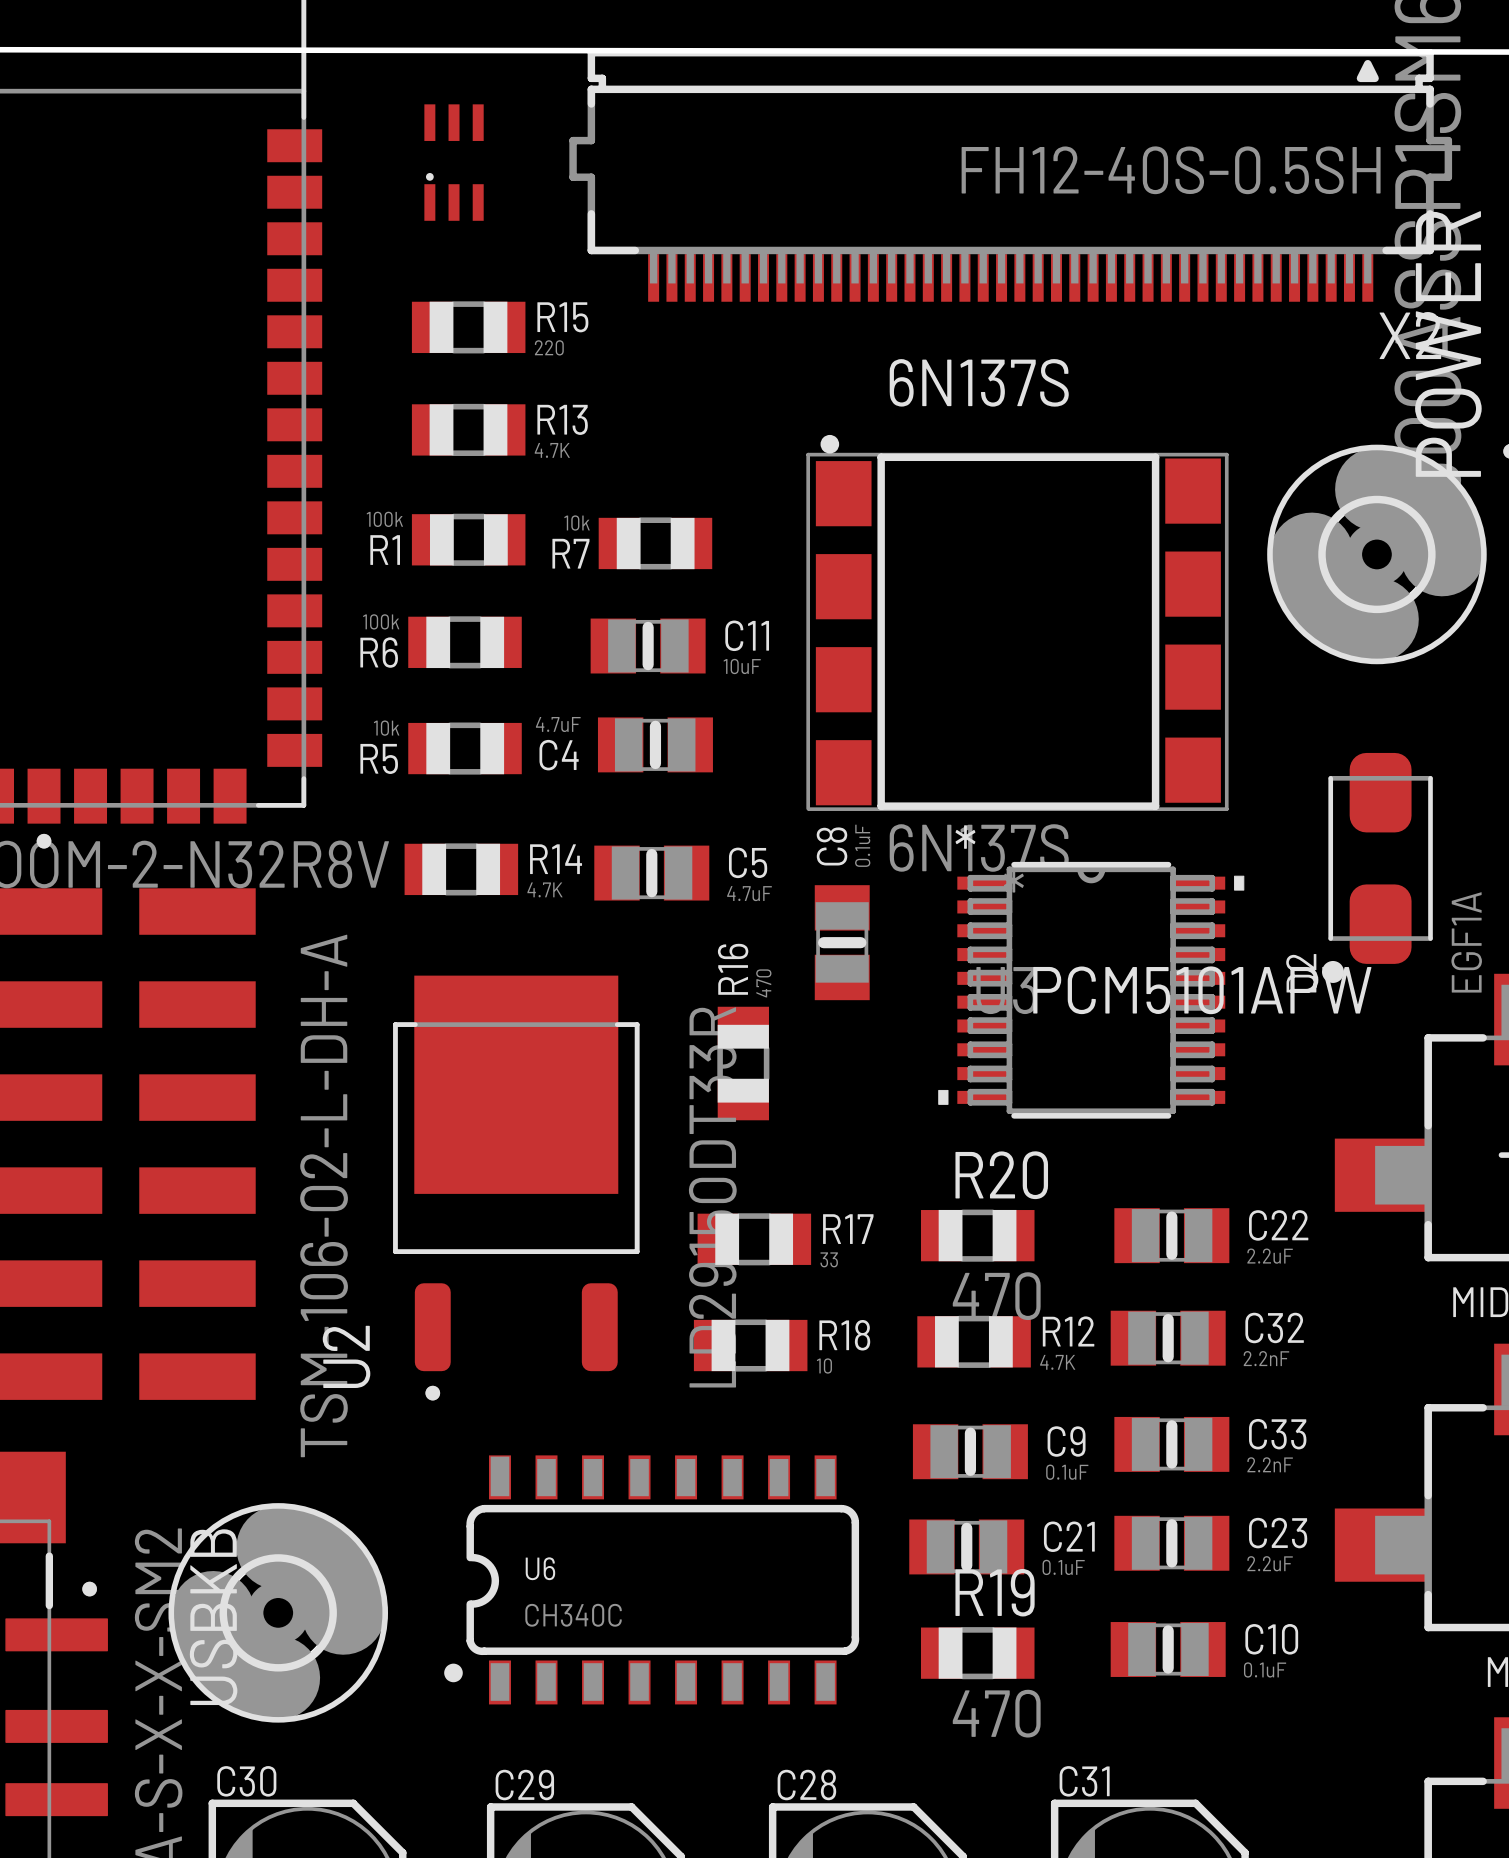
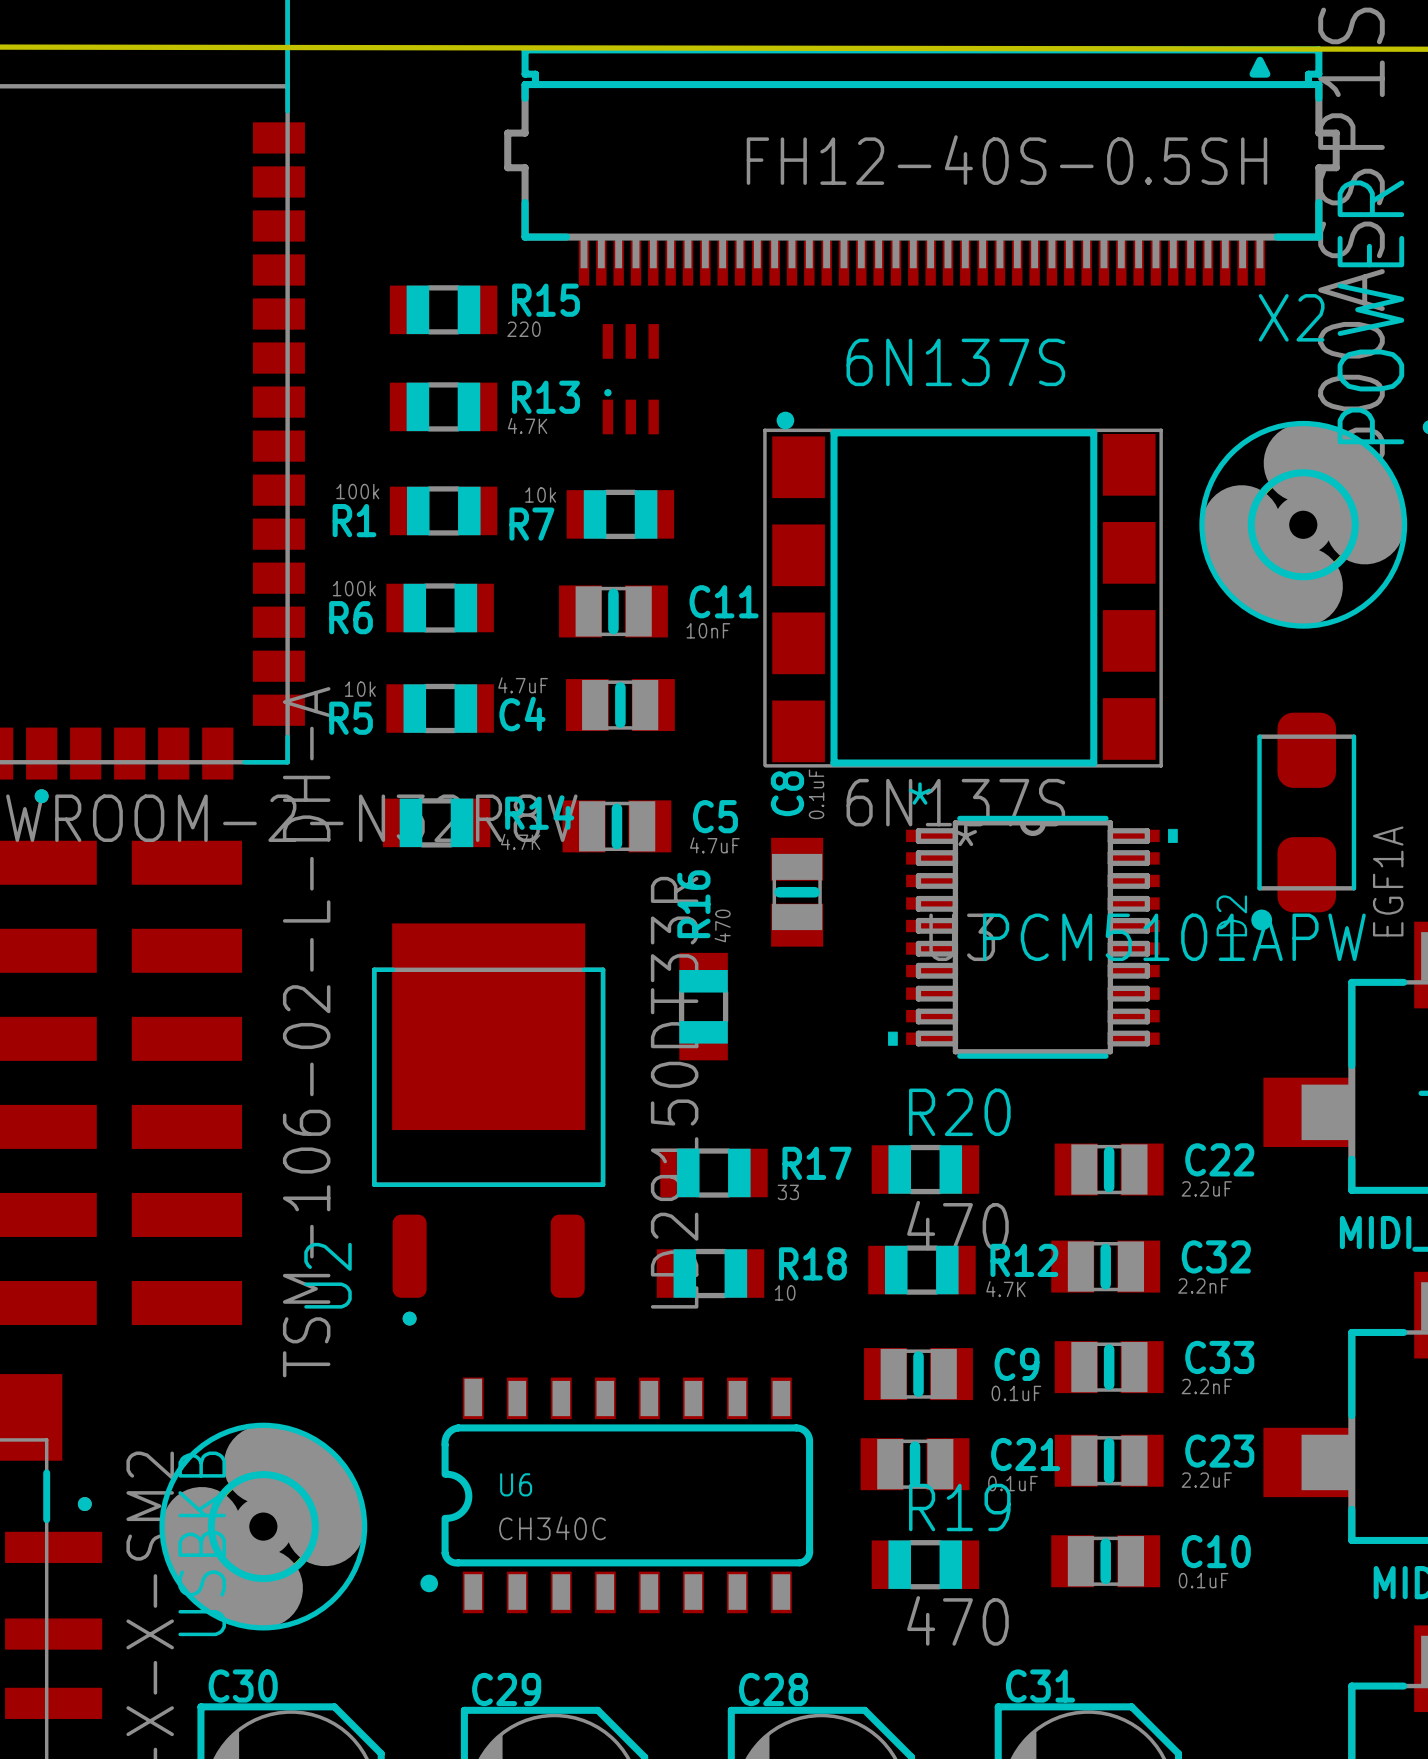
part position: (454, 162) -> (630, 379)
X2 position: (1010, 175) -> (921, 165)
C11 value: 10uF (742, 666) -> 10nF (708, 630)

